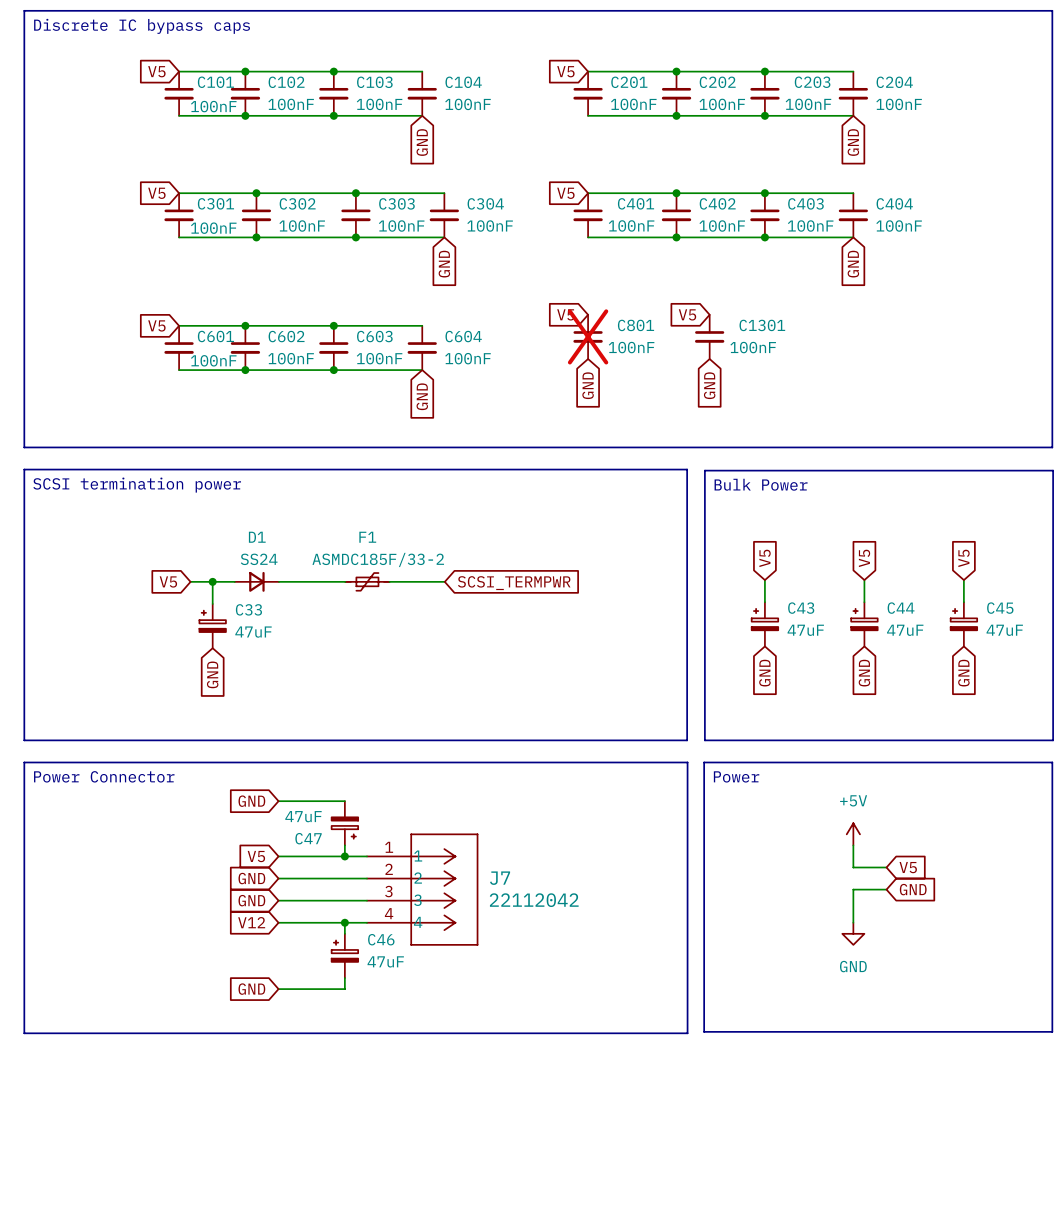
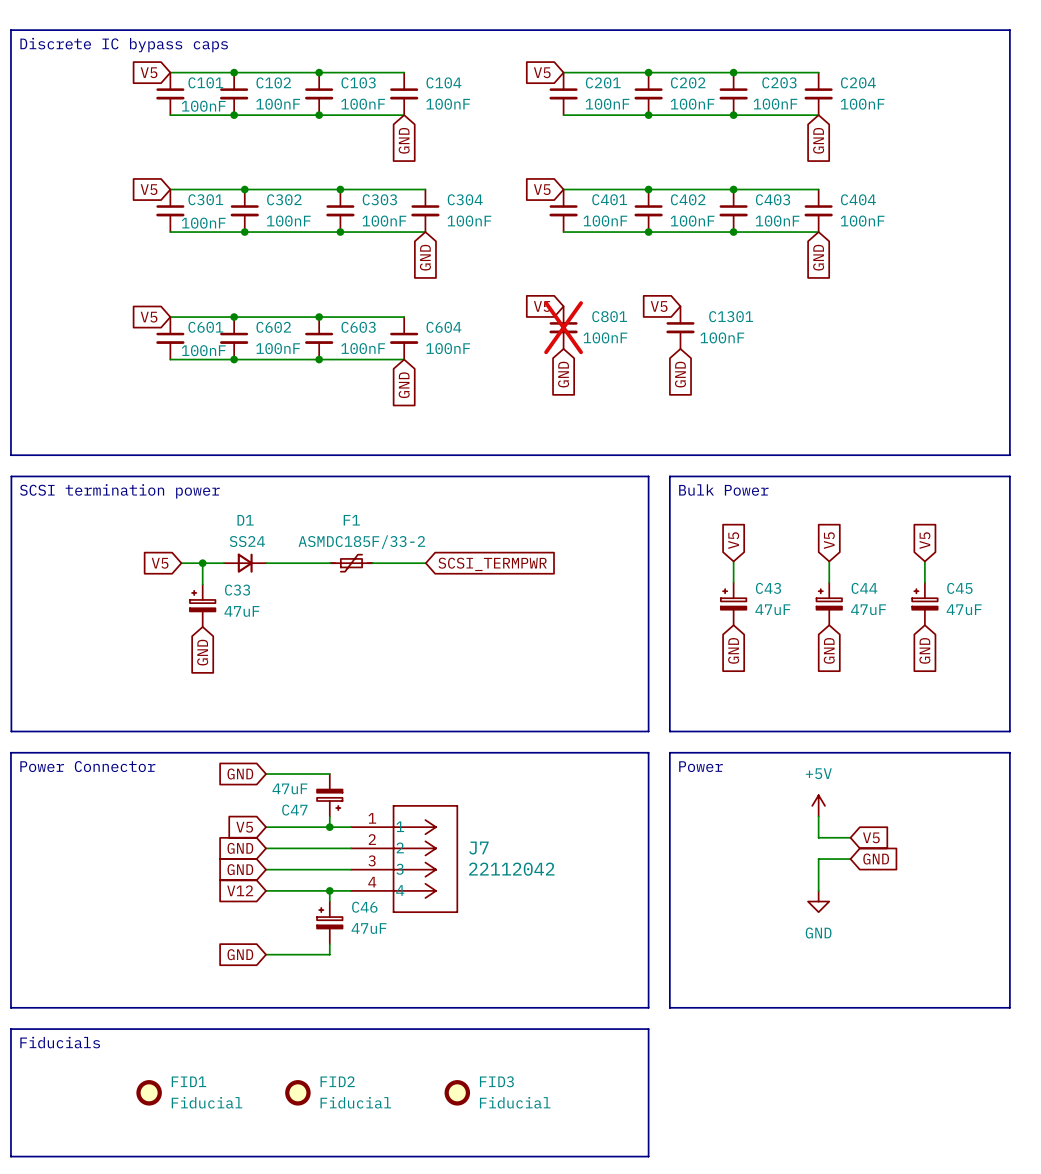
text position: Discrete IC bypass caps (142, 26) -> Discrete IC bypass caps (124, 45)
line: (1052, 27) (1052, 10) (24, 10) (24, 447) (1052, 447) -> (658, 455) (1009, 455) (1009, 433)
line: (24, 469) (24, 740) (687, 740) (687, 469) -> (21, 455) (10, 455) (10, 30) (1009, 30)
line: (704, 470) (1053, 470) (1053, 740) (704, 740) (704, 470) -> (669, 476) (669, 731) (1009, 731) (1009, 476) (669, 476)
text position: Bulk Power (761, 484) -> Bulk Power (723, 490)
text position: SCSI termination power (137, 485) -> SCSI termination power (119, 491)
line: none -> (11, 476) (648, 476) (648, 731) (11, 731) (11, 476)
line: (24, 762) (24, 1033) (687, 1033) (687, 762) (24, 762) -> (10, 752) (10, 1007) (648, 1007) (648, 752) (10, 752)
text position: Power Connector (104, 776) -> Power Connector (87, 766)
text position: Power (736, 776) -> Power (701, 766)
line: (1052, 779) (1052, 762) (704, 762) (704, 1031) (1052, 1031) -> (1009, 752) (669, 752) (669, 1007) (1009, 1007) (1009, 995)
line: none -> (10, 1029) (10, 1156) (648, 1156) (648, 1029) (10, 1029)
text: none -> Fiducials (60, 1042)
FID1: none -> Fiducial (149, 1092)
FID2: none -> Fiducial (297, 1092)
FID3: none -> Fiducial (457, 1092)

